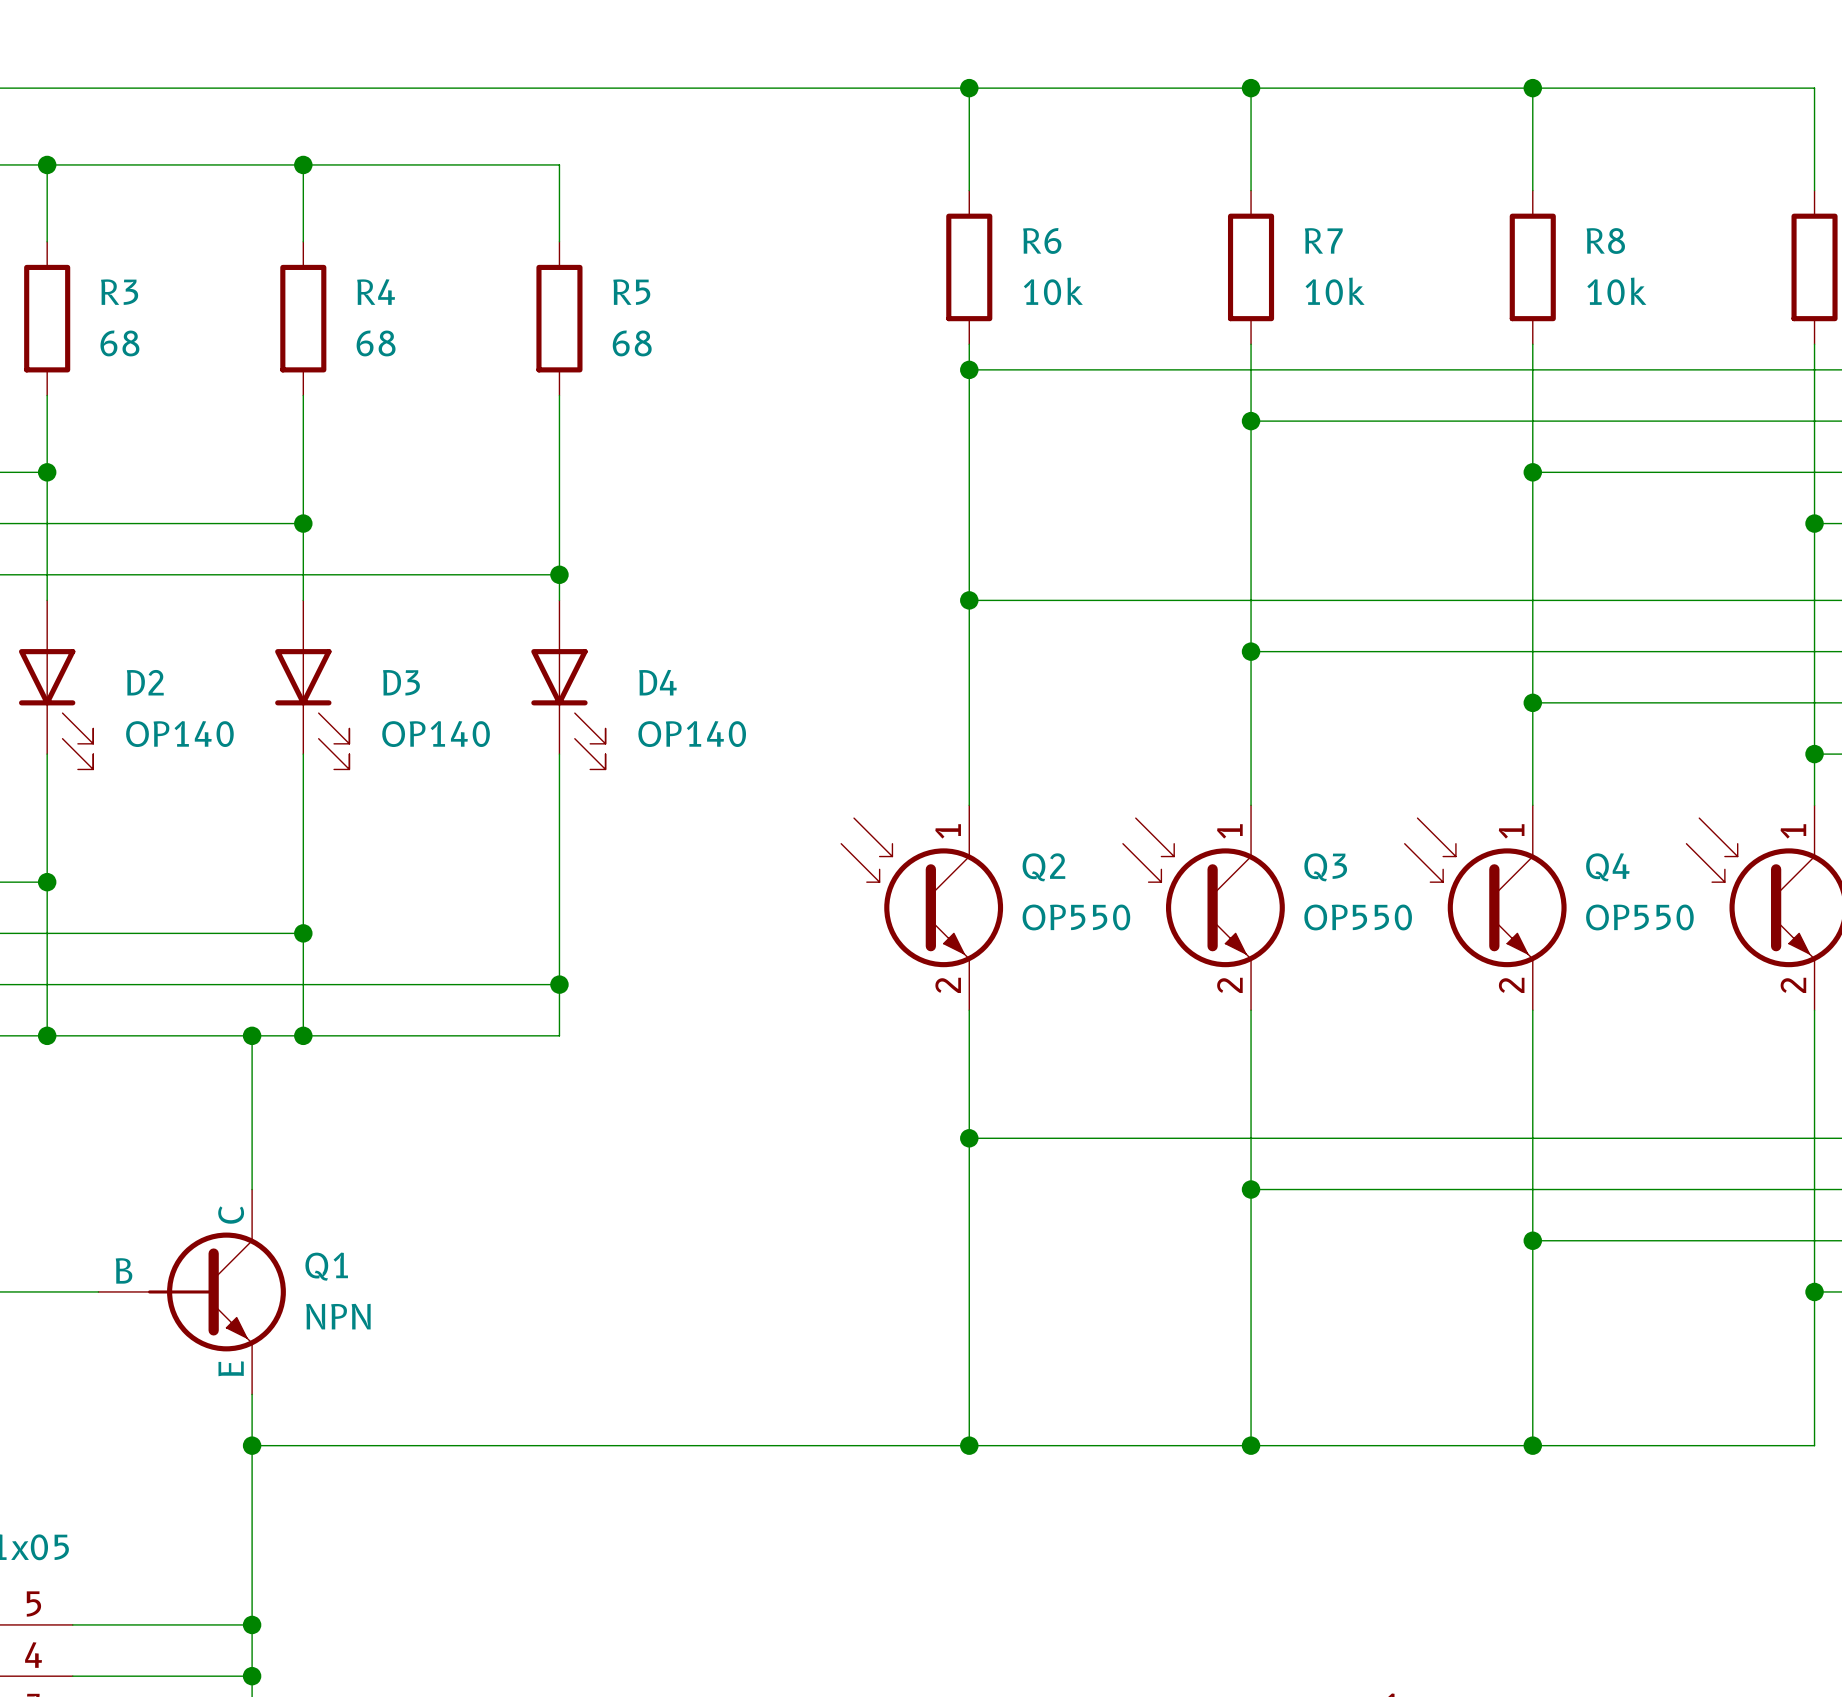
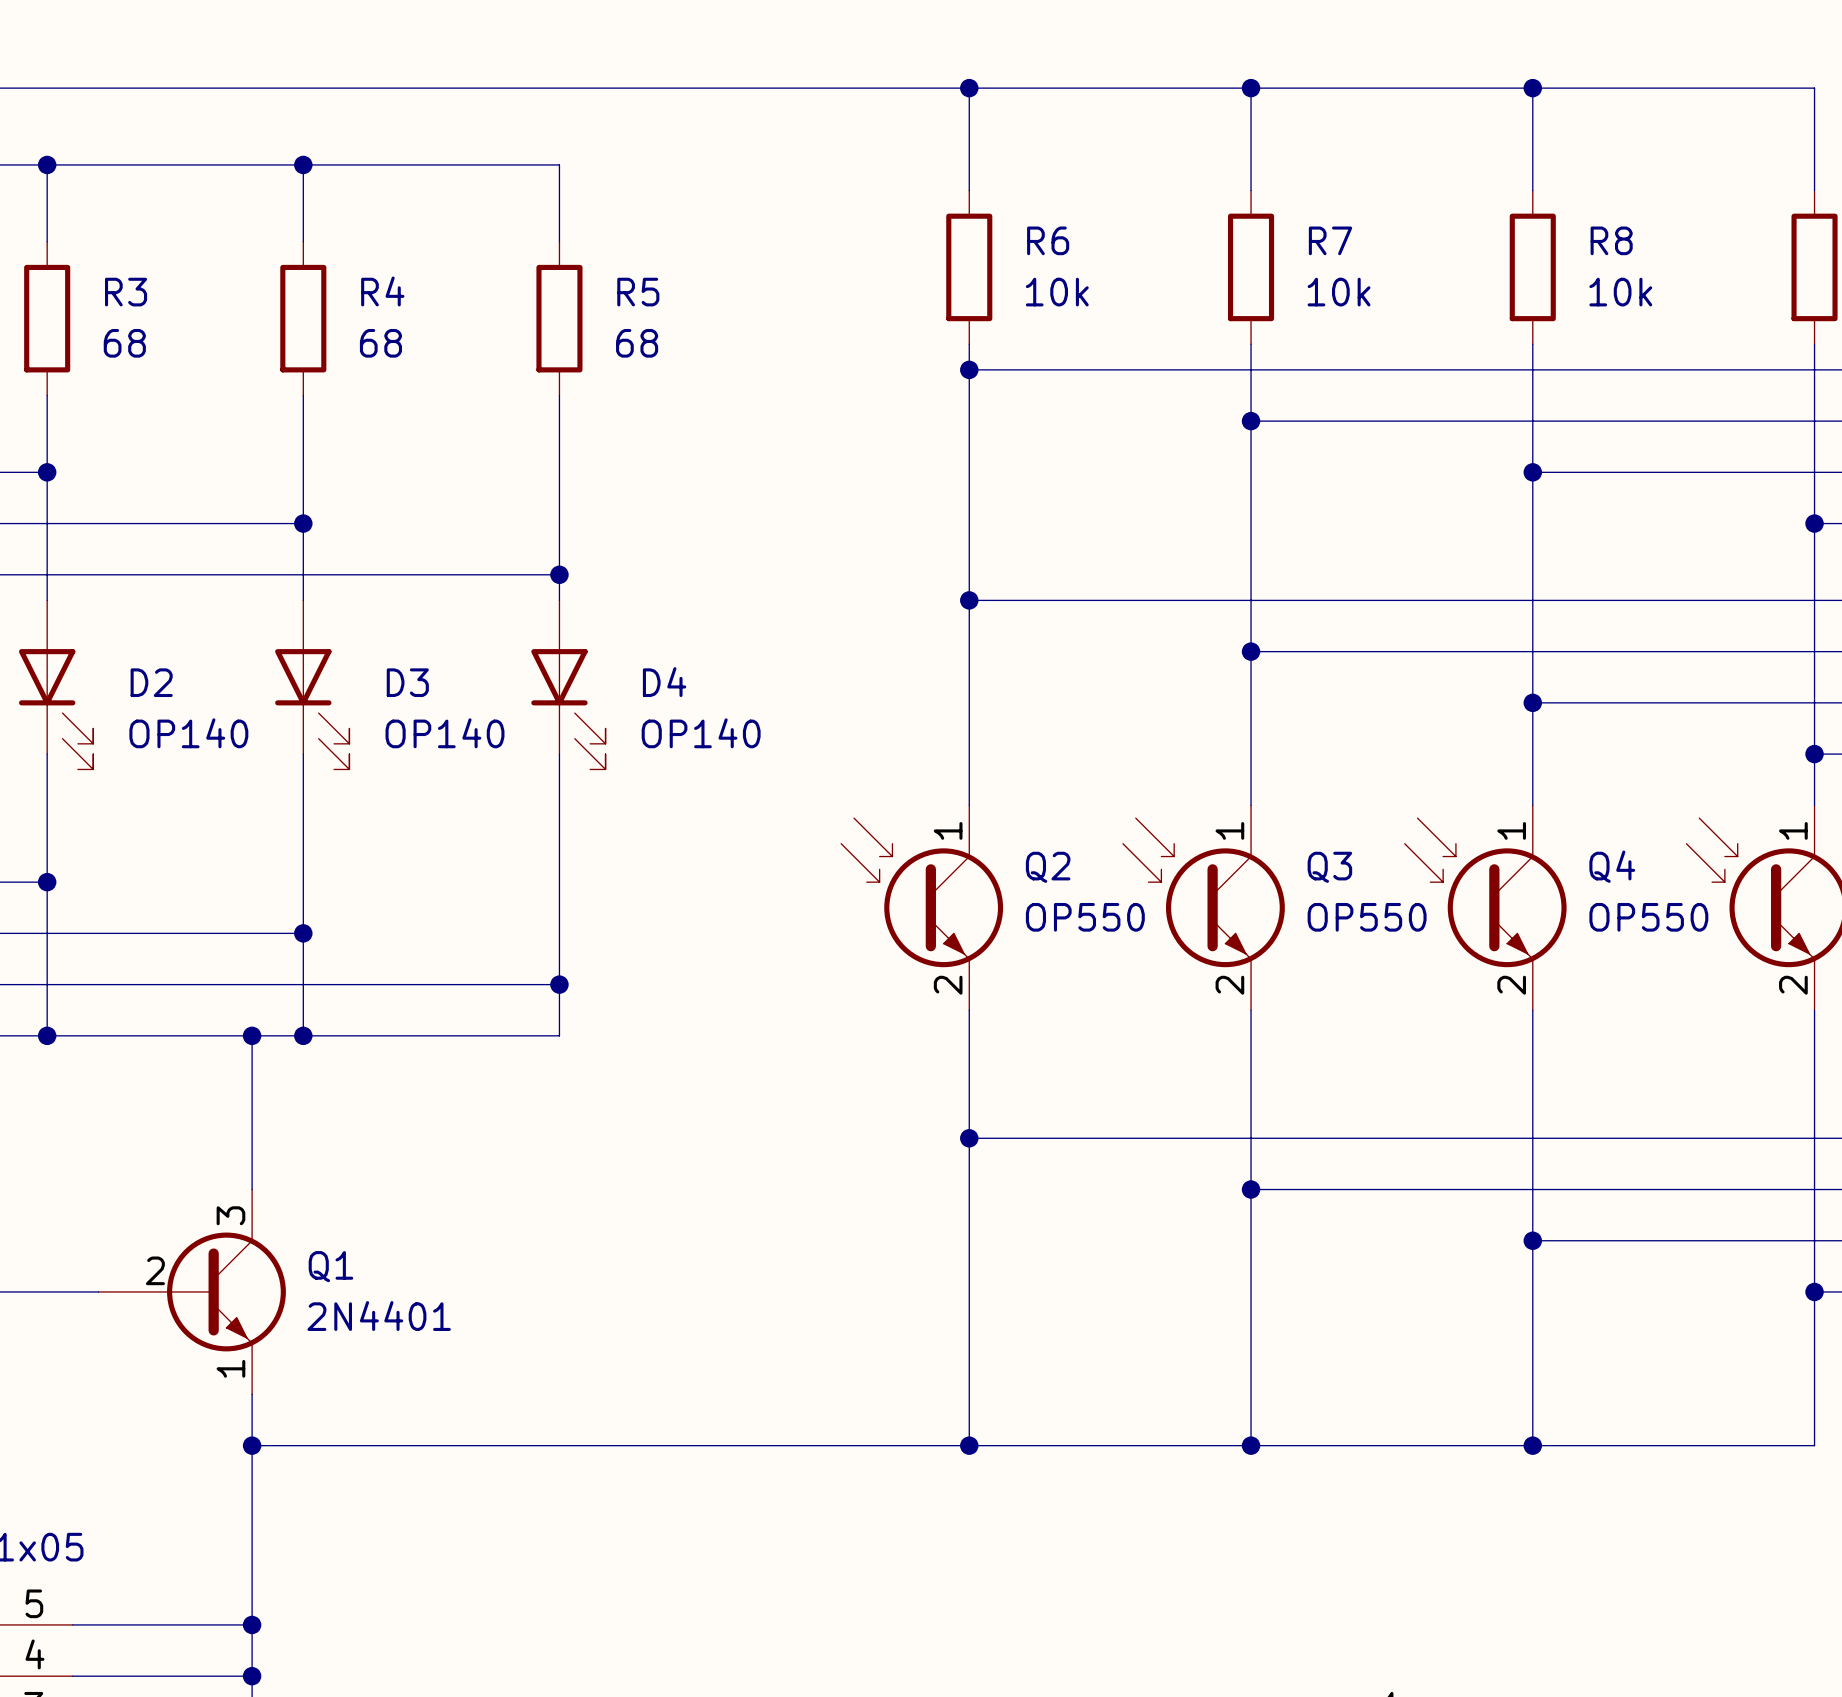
Q1 symbol: [98, 1189, 286, 1395] -> [98, 1189, 286, 1395]
Q1 value: NPN (338, 1316) -> 2N4401 (379, 1316)

